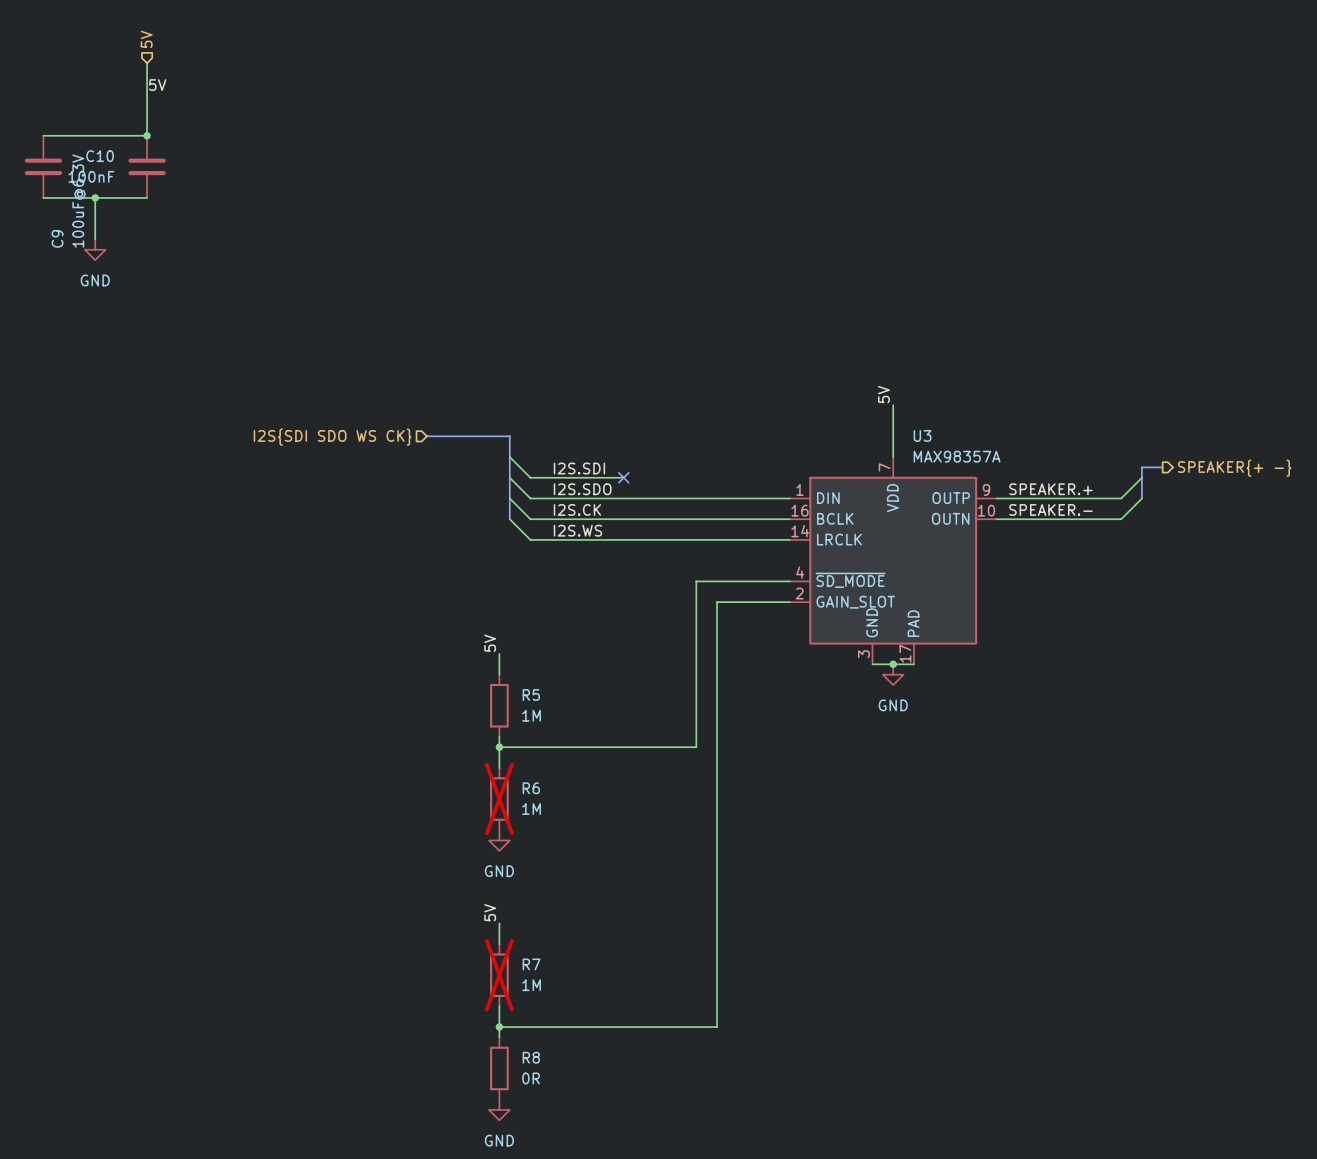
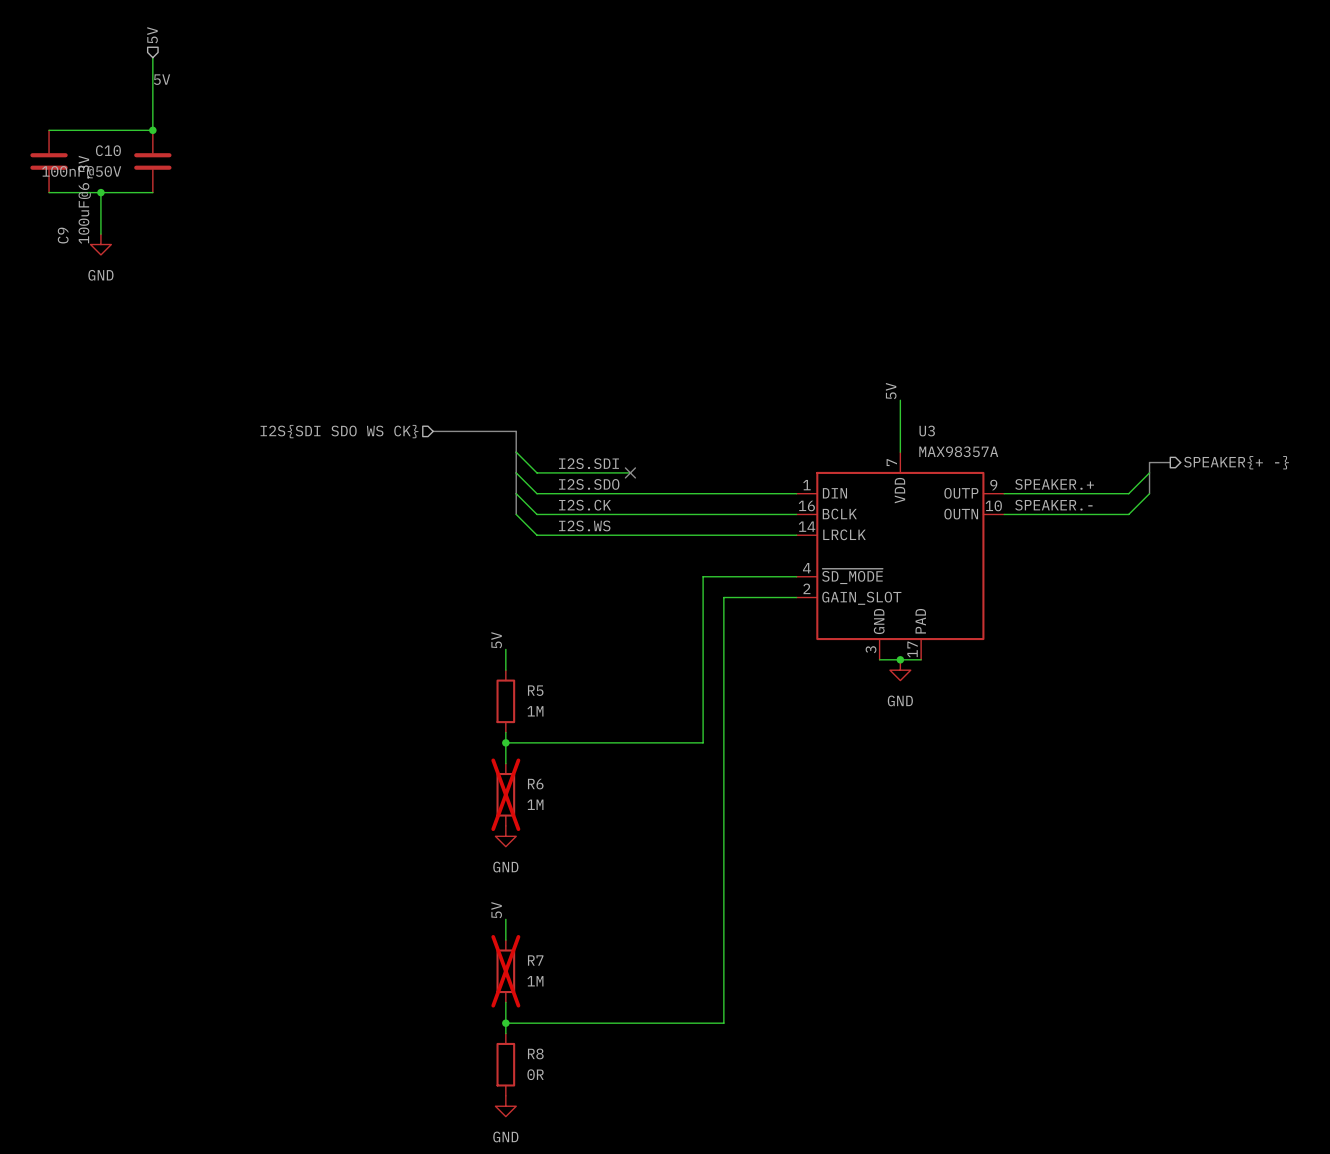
C10 value: 100nF (91, 176) -> 100nF@50V (81, 172)

